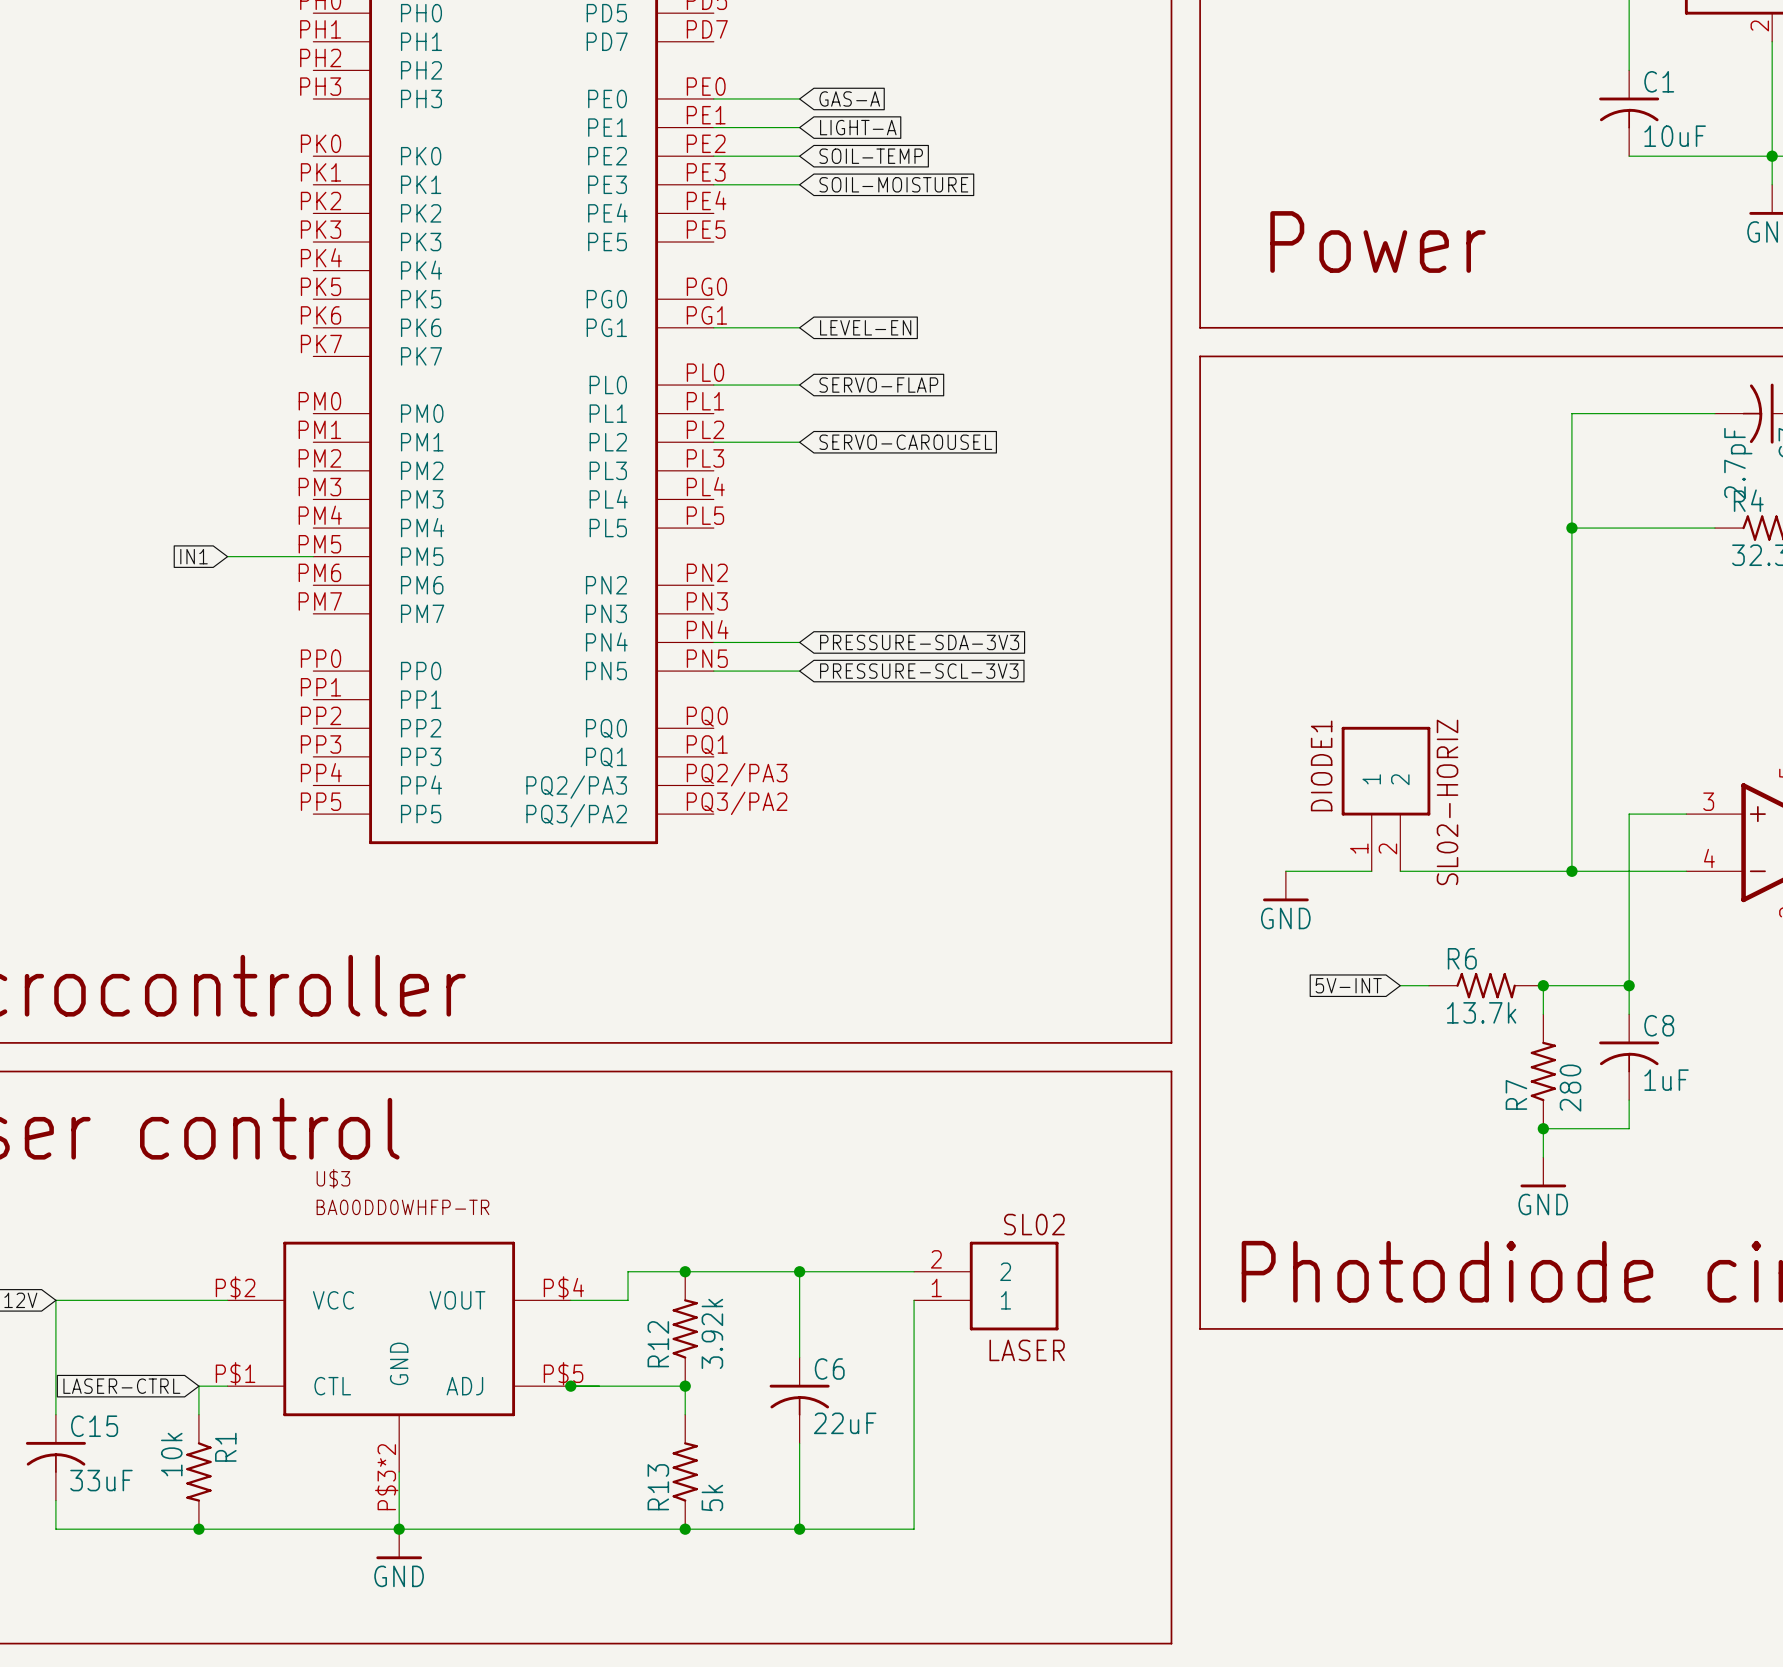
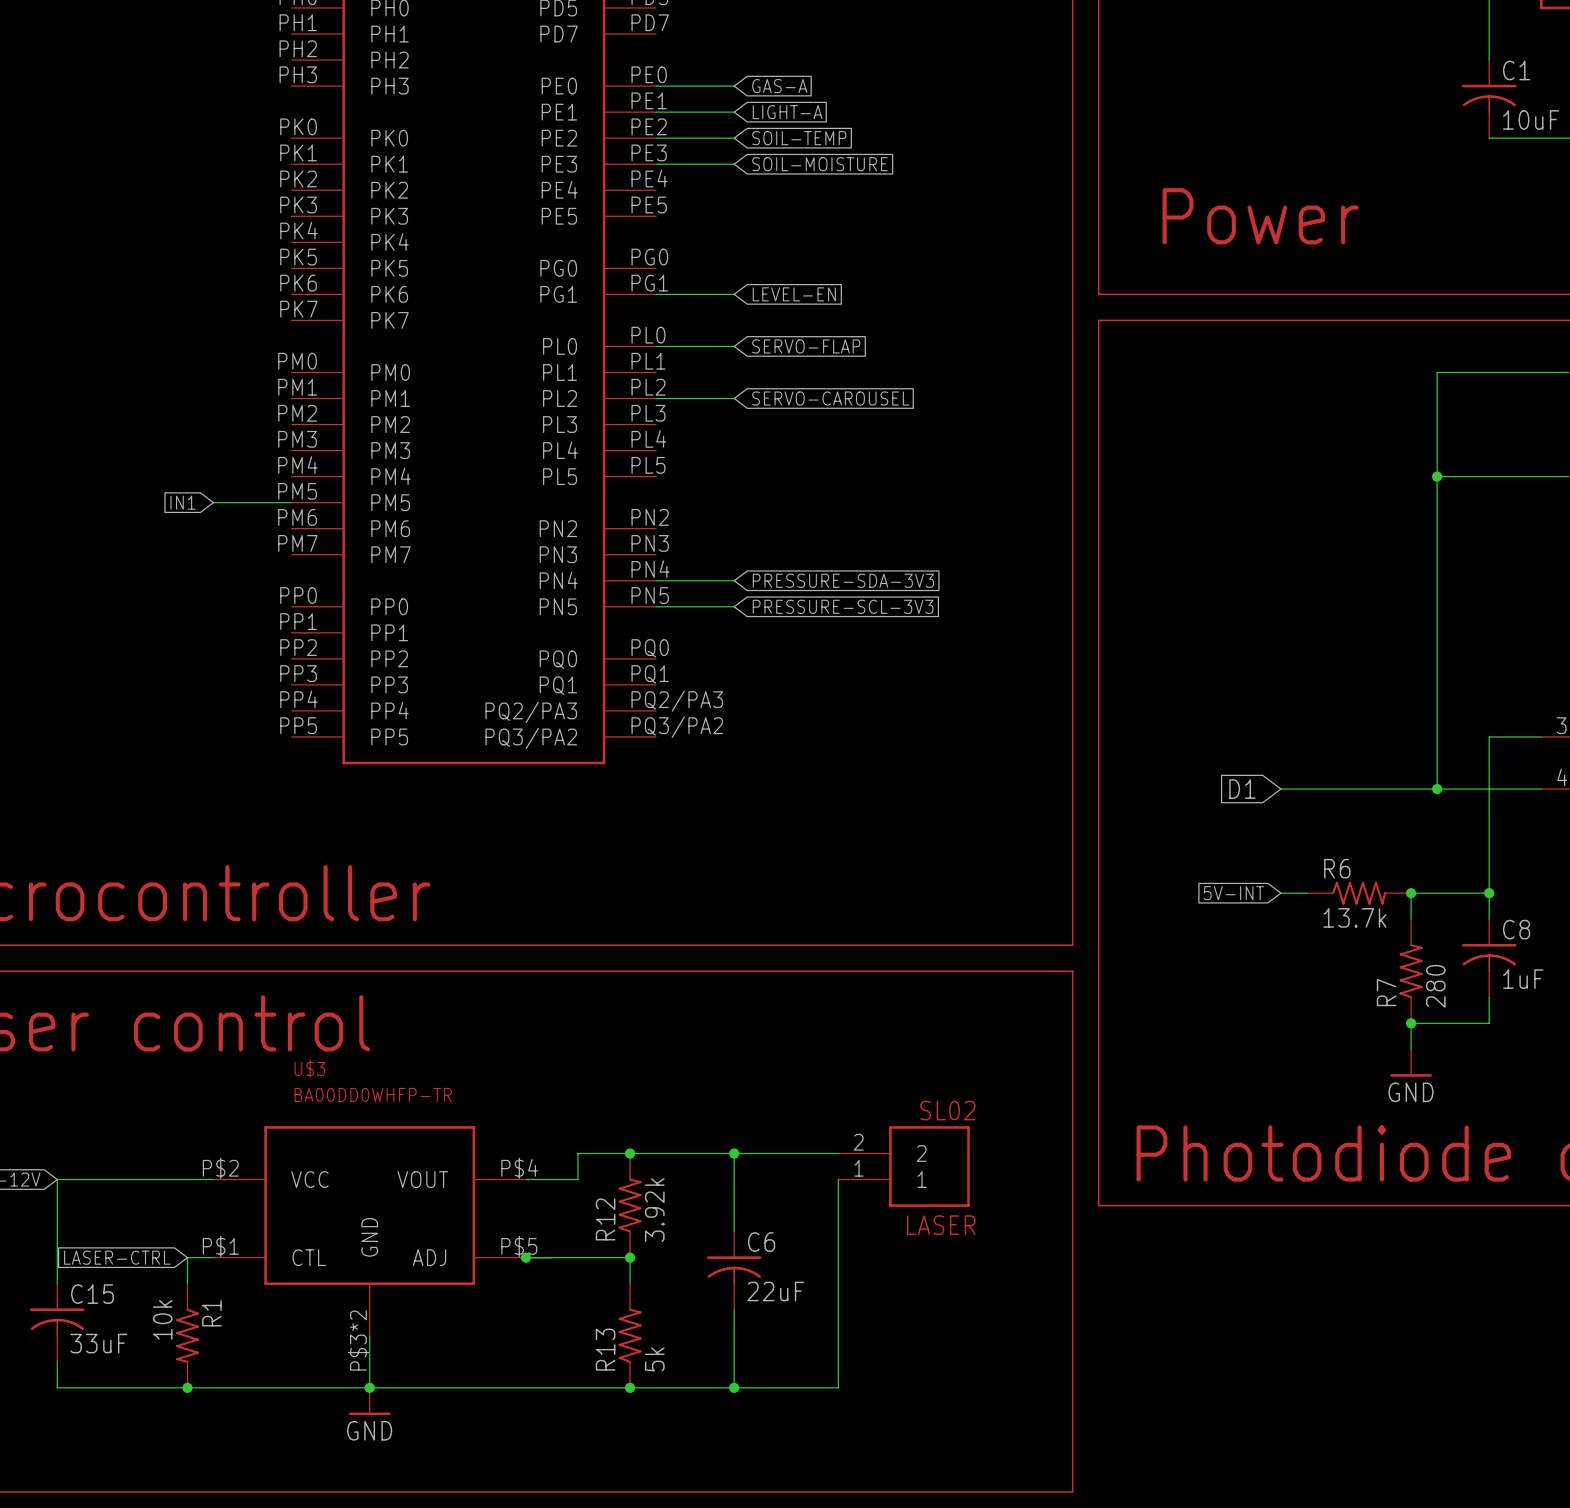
DIODE1: SL02-HORIZ (1386, 799) -> none
wire: (1285, 871) (1371, 871) -> none
global label: none -> D1 (1242, 789)
power symbol: GND (1285, 886) -> none

